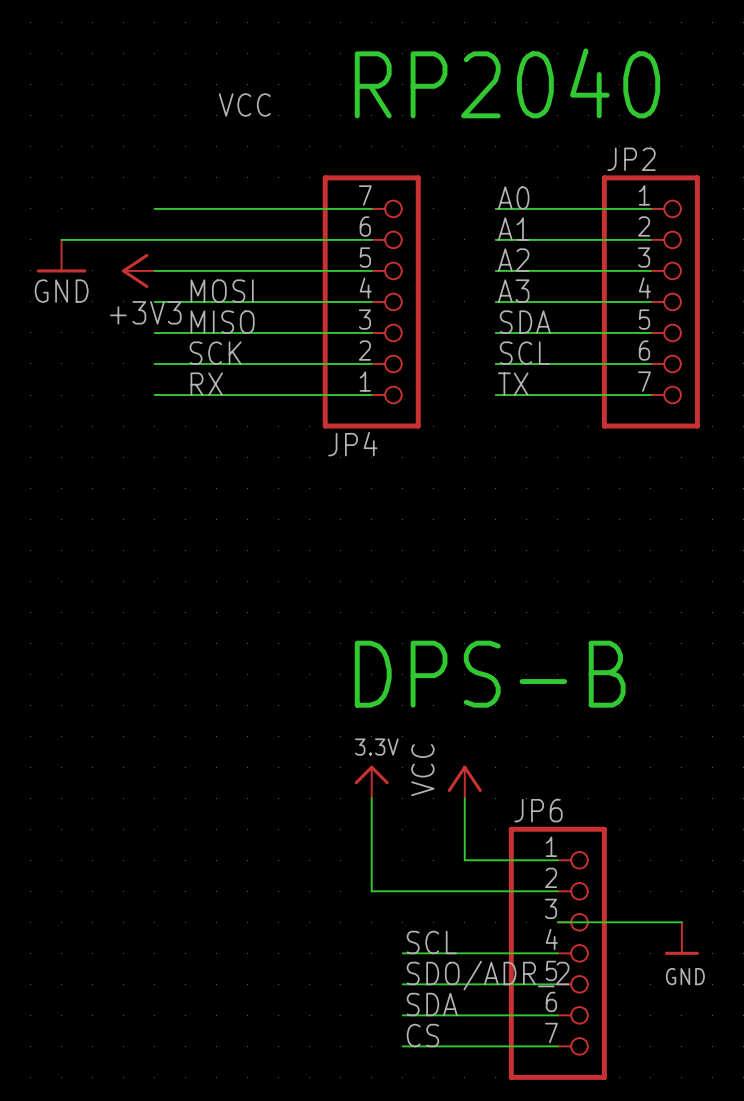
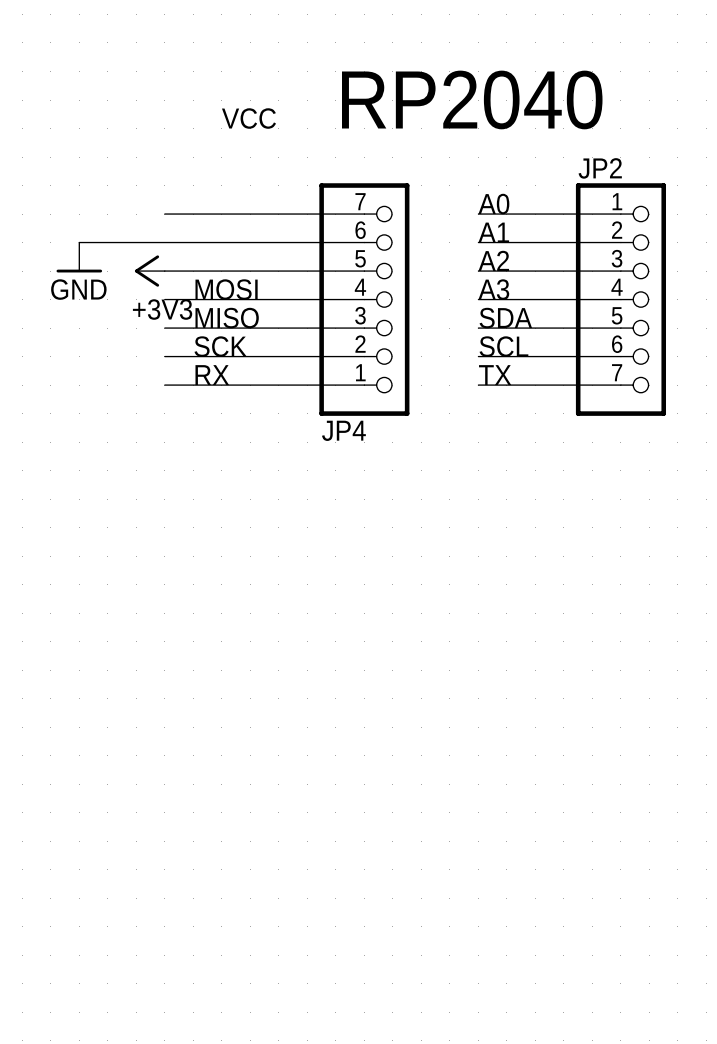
text: DPS-B (490, 674) -> none
power symbol: 3.3V (371, 781) -> none
power symbol: VCC (464, 781) -> none
wire: (371, 798) (371, 891) (557, 891) -> none
wire: (464, 798) (464, 860) (557, 860) -> none
wire: (557, 922) (681, 922) -> none
power symbol: GND (681, 938) -> none
label: SCL (431, 942) -> none
wire: (402, 953) (557, 953) -> none
JP6: (557, 953) -> none
label: SDO/ADR_2 (488, 975) -> none
wire: (402, 984) (557, 984) -> none
label: SDA (432, 1004) -> none
wire: (402, 1015) (557, 1015) -> none
label: CS (422, 1035) -> none
wire: (402, 1046) (557, 1046) -> none

